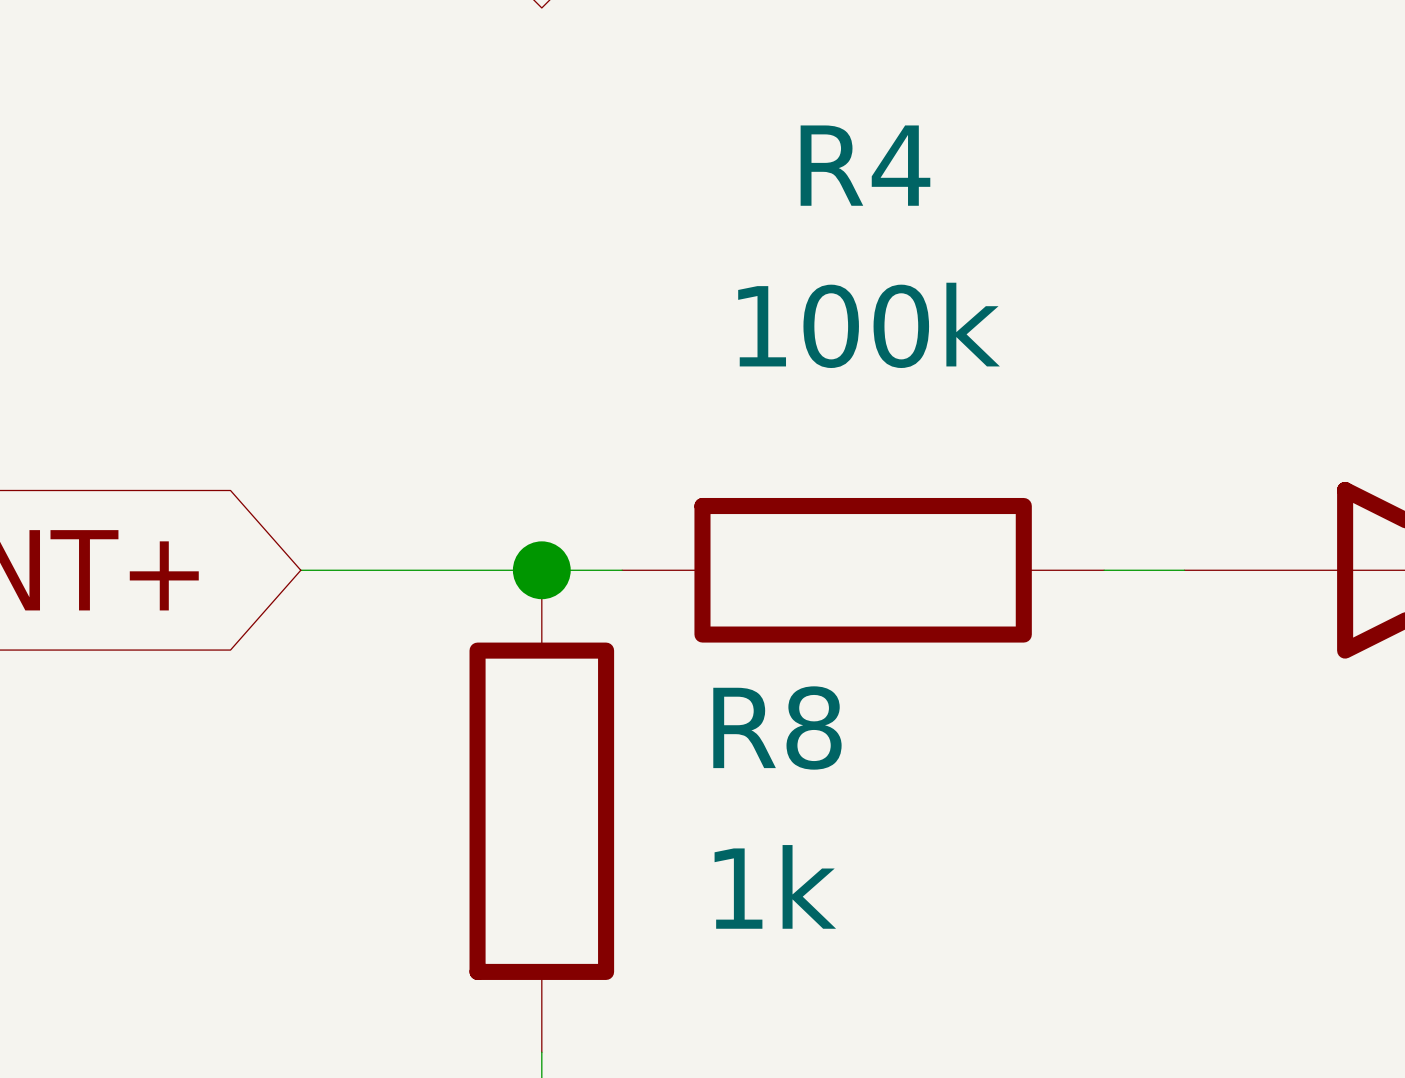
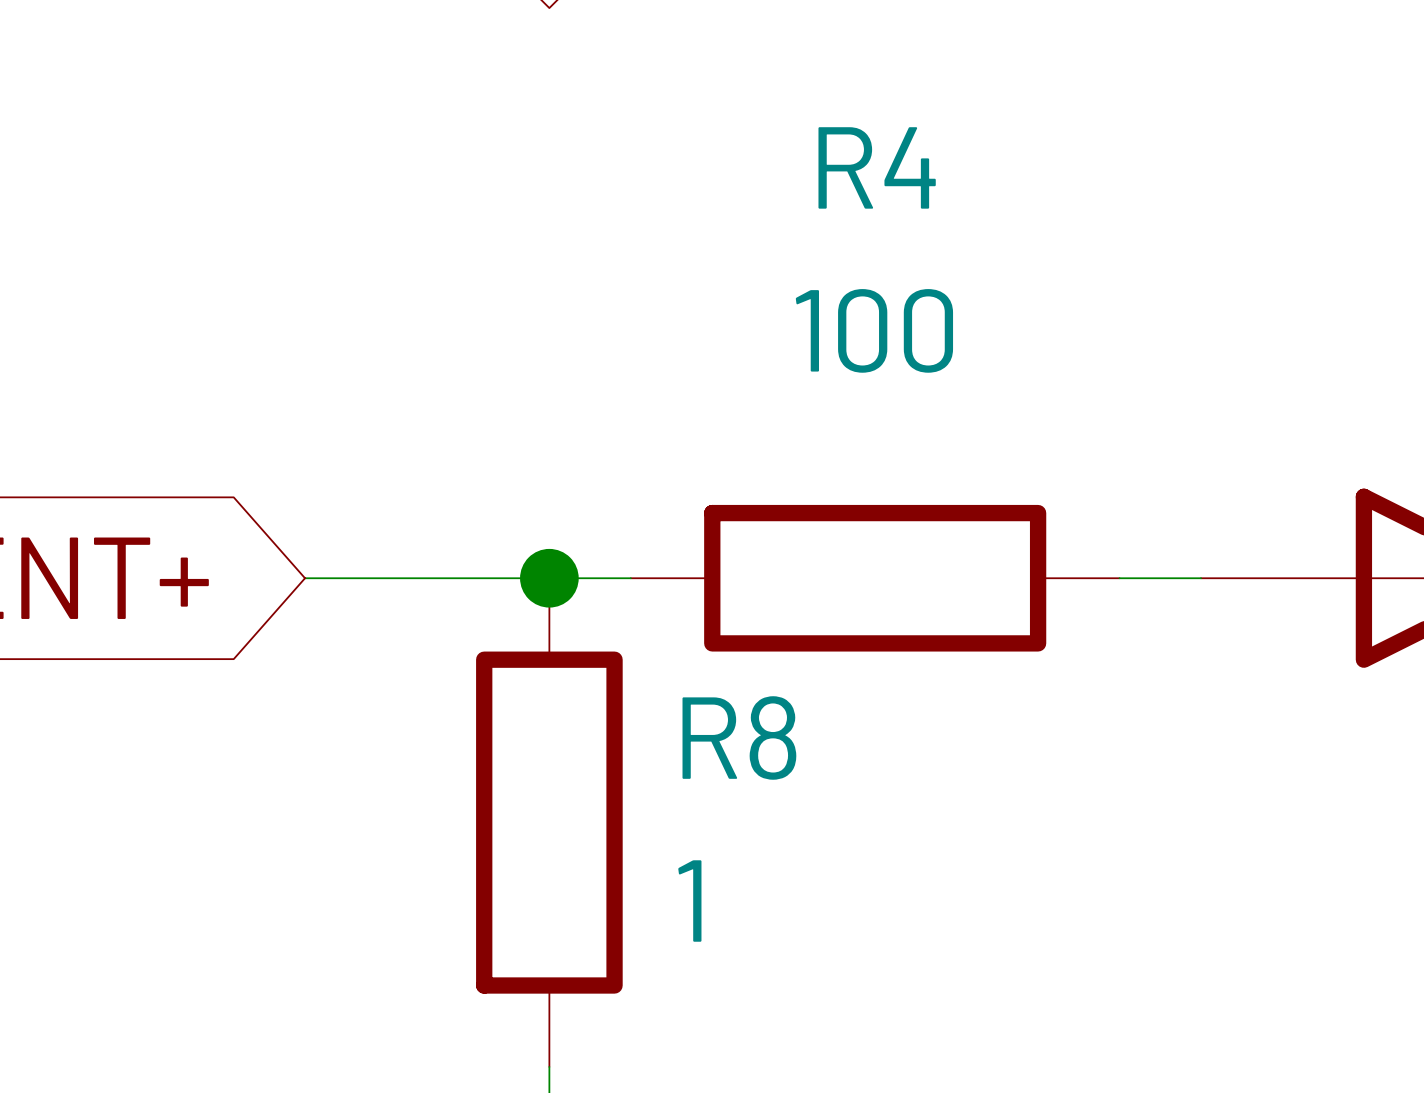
R4 value: 100k (869, 325) -> 100 (874, 330)
R8 name position: R8 (777, 727) -> R8 (739, 737)
R8 value: 1k (775, 886) -> 1 (689, 901)

